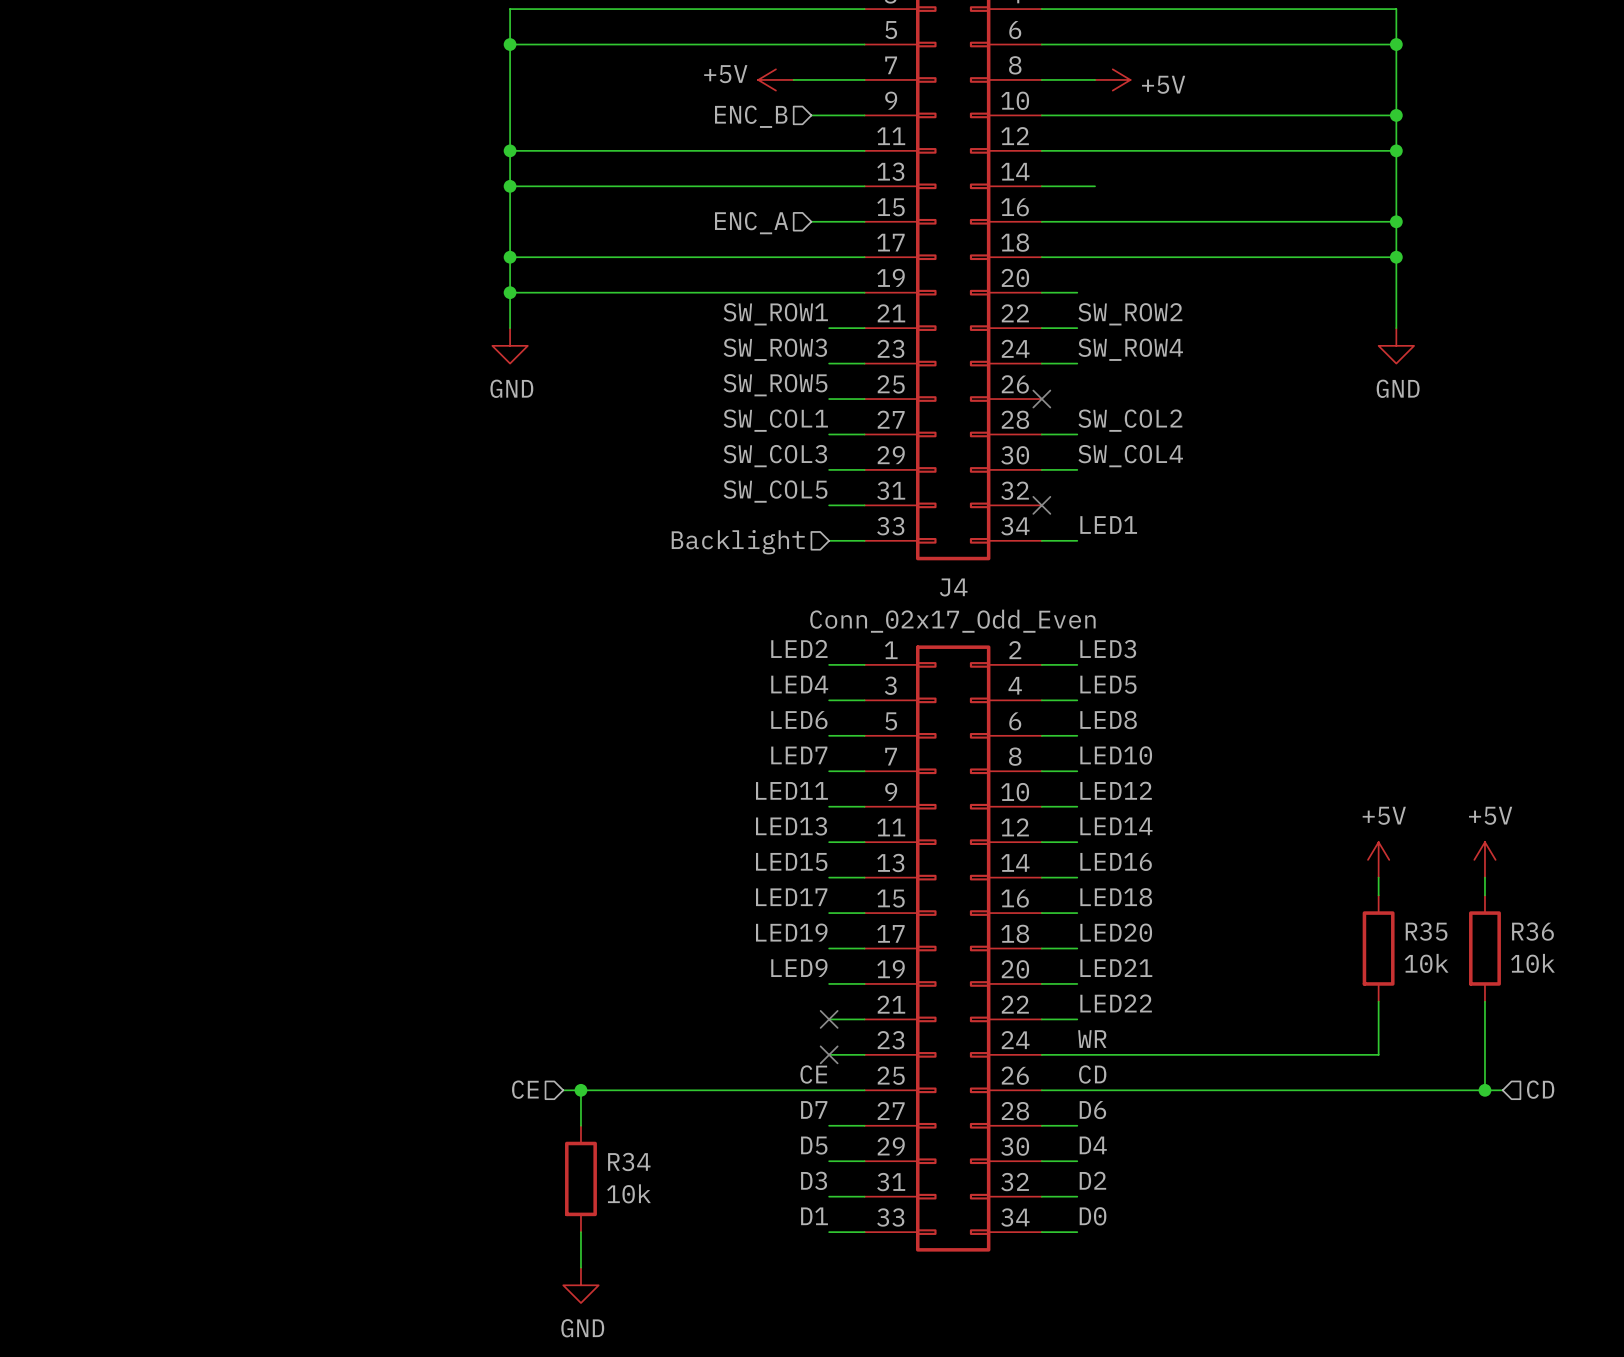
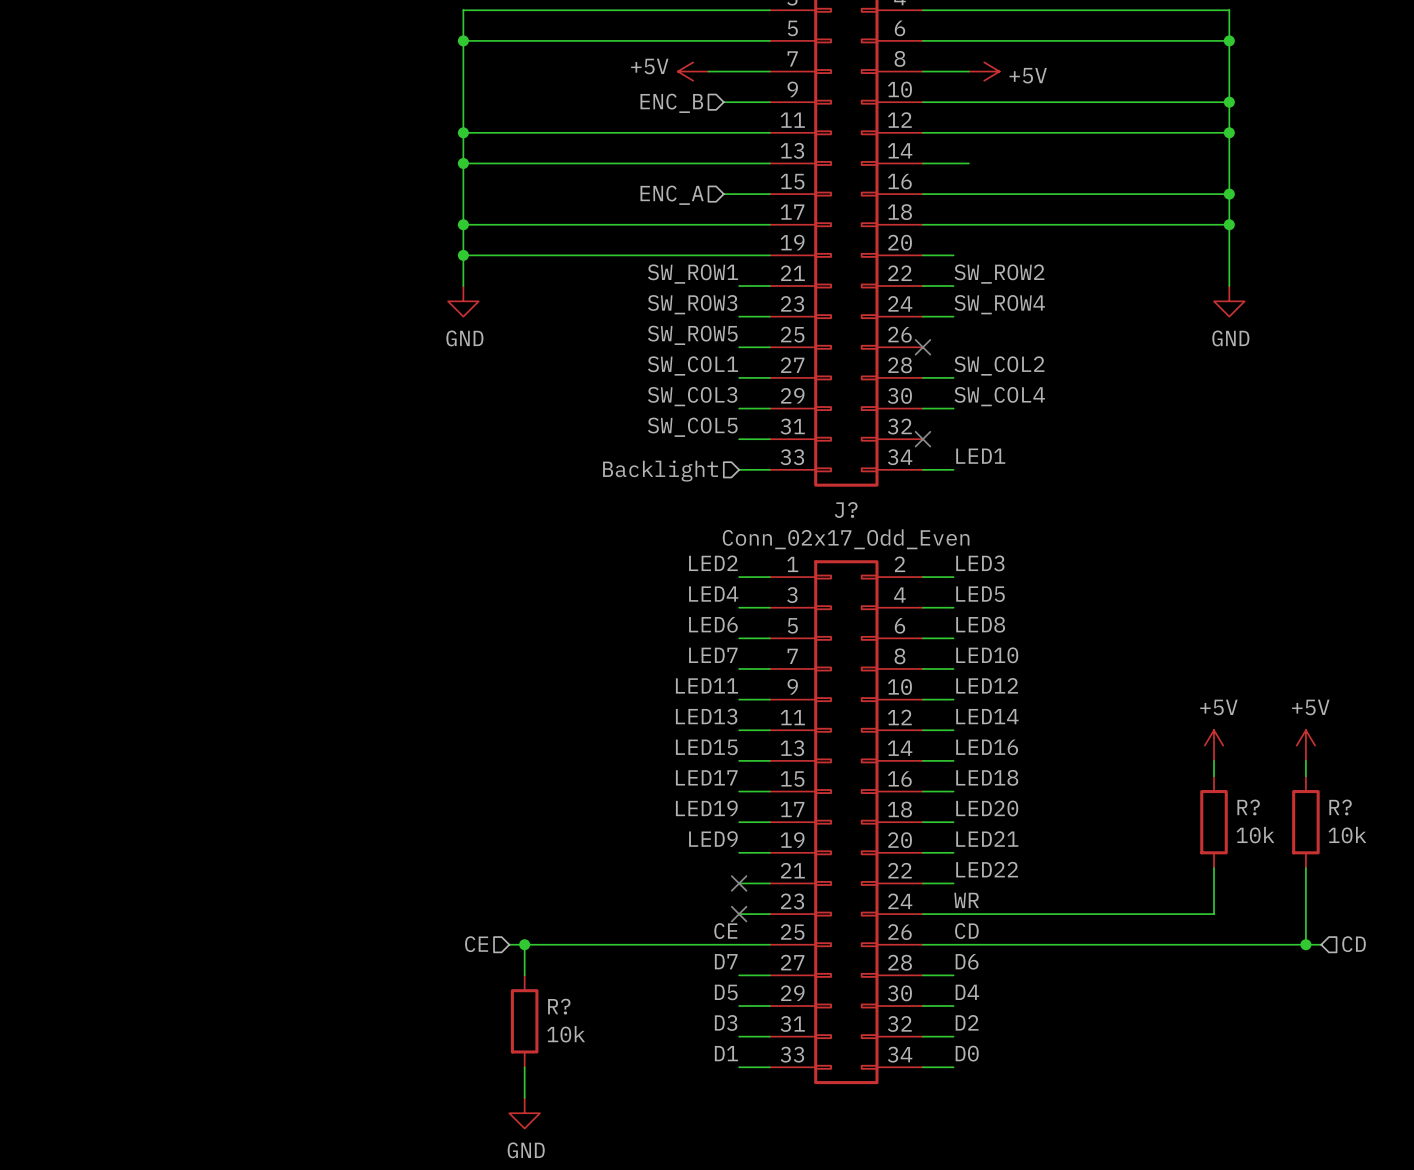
J4 name: J4 (953, 587) -> J? (846, 510)
R35 name: R35 (1426, 931) -> R? (1248, 807)
R36 name: R36 (1532, 931) -> R? (1340, 807)
R34 name: R34 (629, 1161) -> R? (559, 1006)

